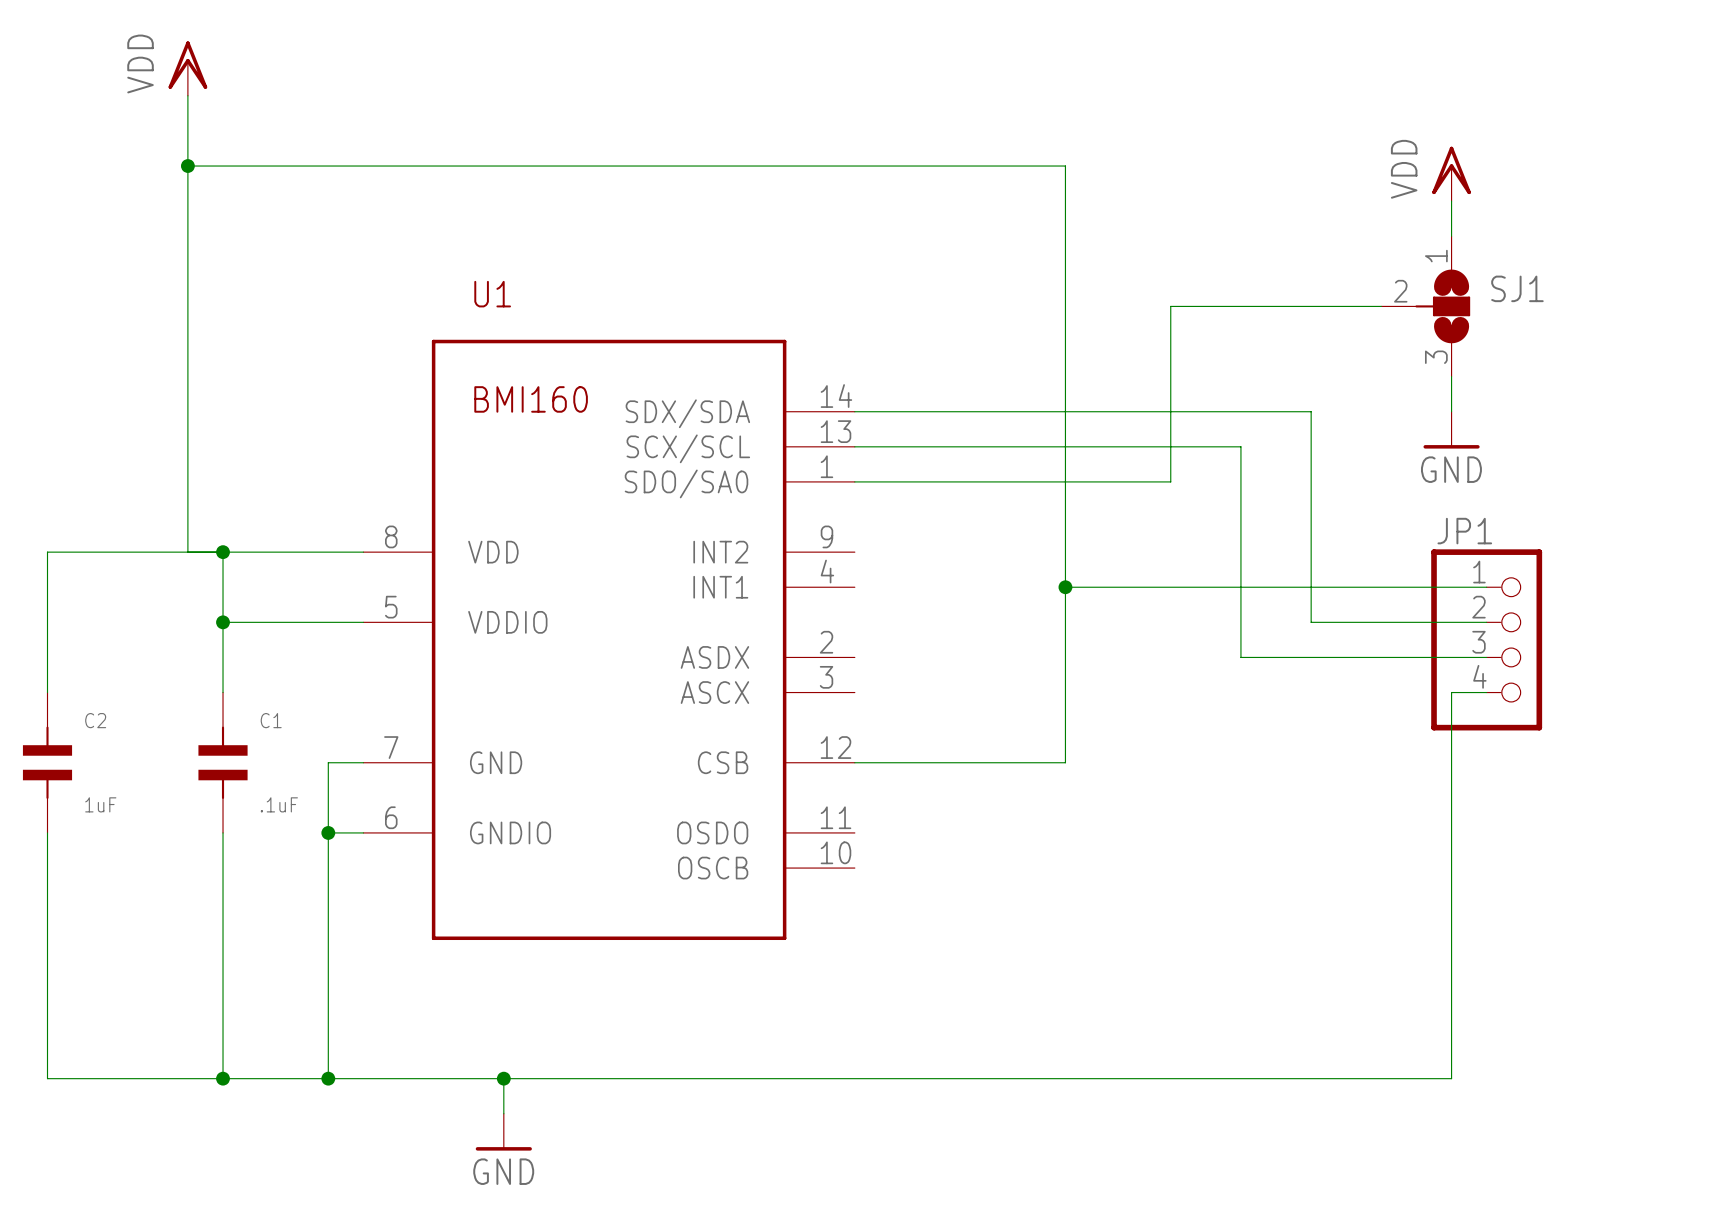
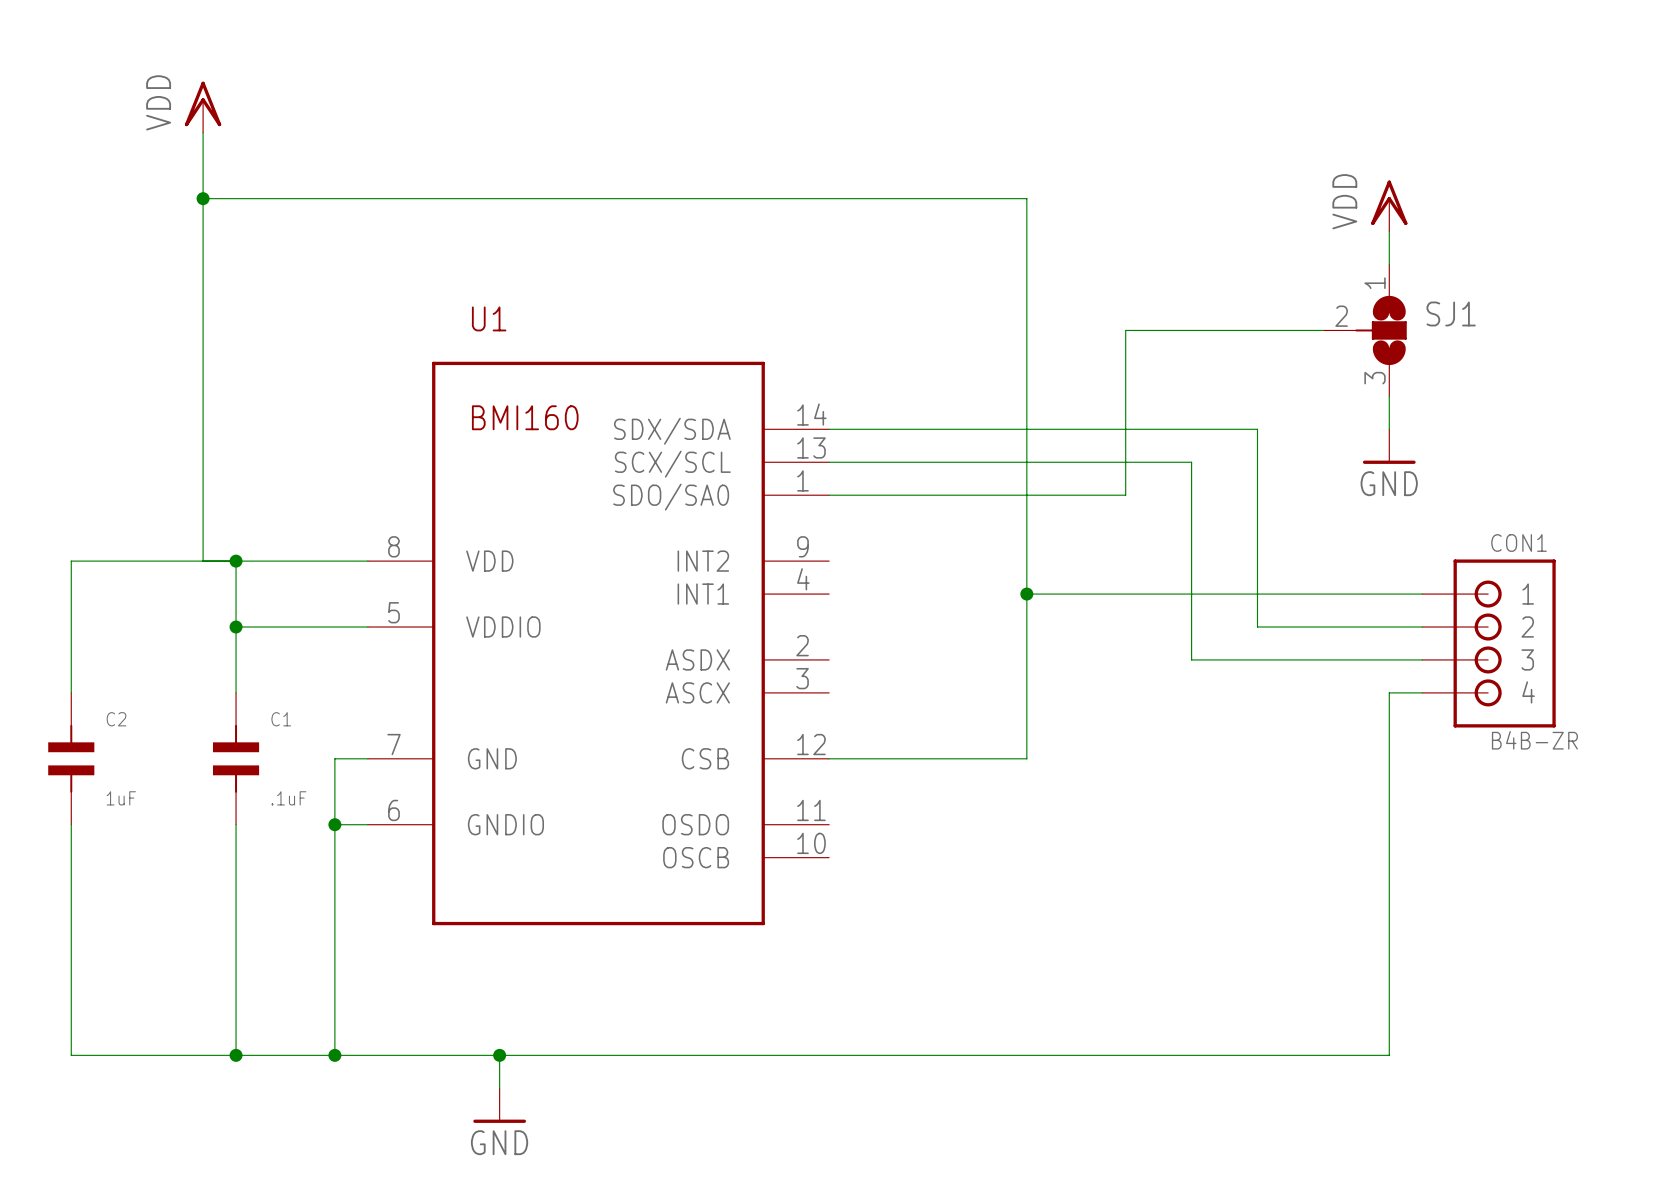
JP1: (1486, 639) -> none
CON1: none -> B4B-ZR (1488, 643)

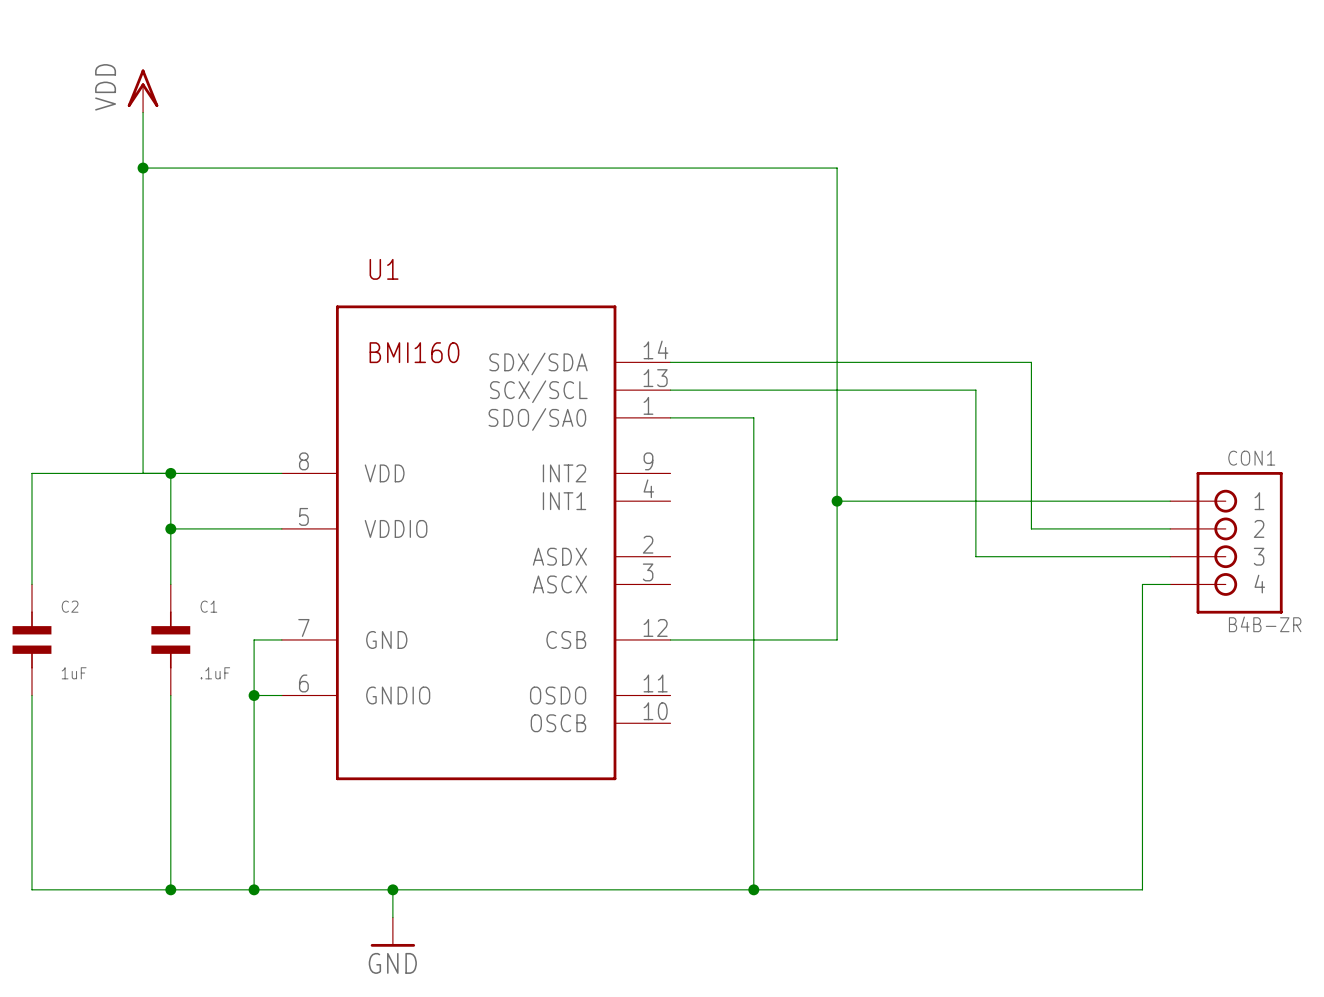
power symbol: VDD (1389, 206) -> none
wire: (1389, 231) (1389, 264) -> none
wire: (1323, 330) (1125, 330) (1125, 495) (927, 495) -> (753, 889) (753, 417)
SJ1: (1365, 330) -> none
wire: (1389, 396) (1389, 429) -> none
power symbol: GND (1389, 446) -> none
junction: none -> (753, 889)

